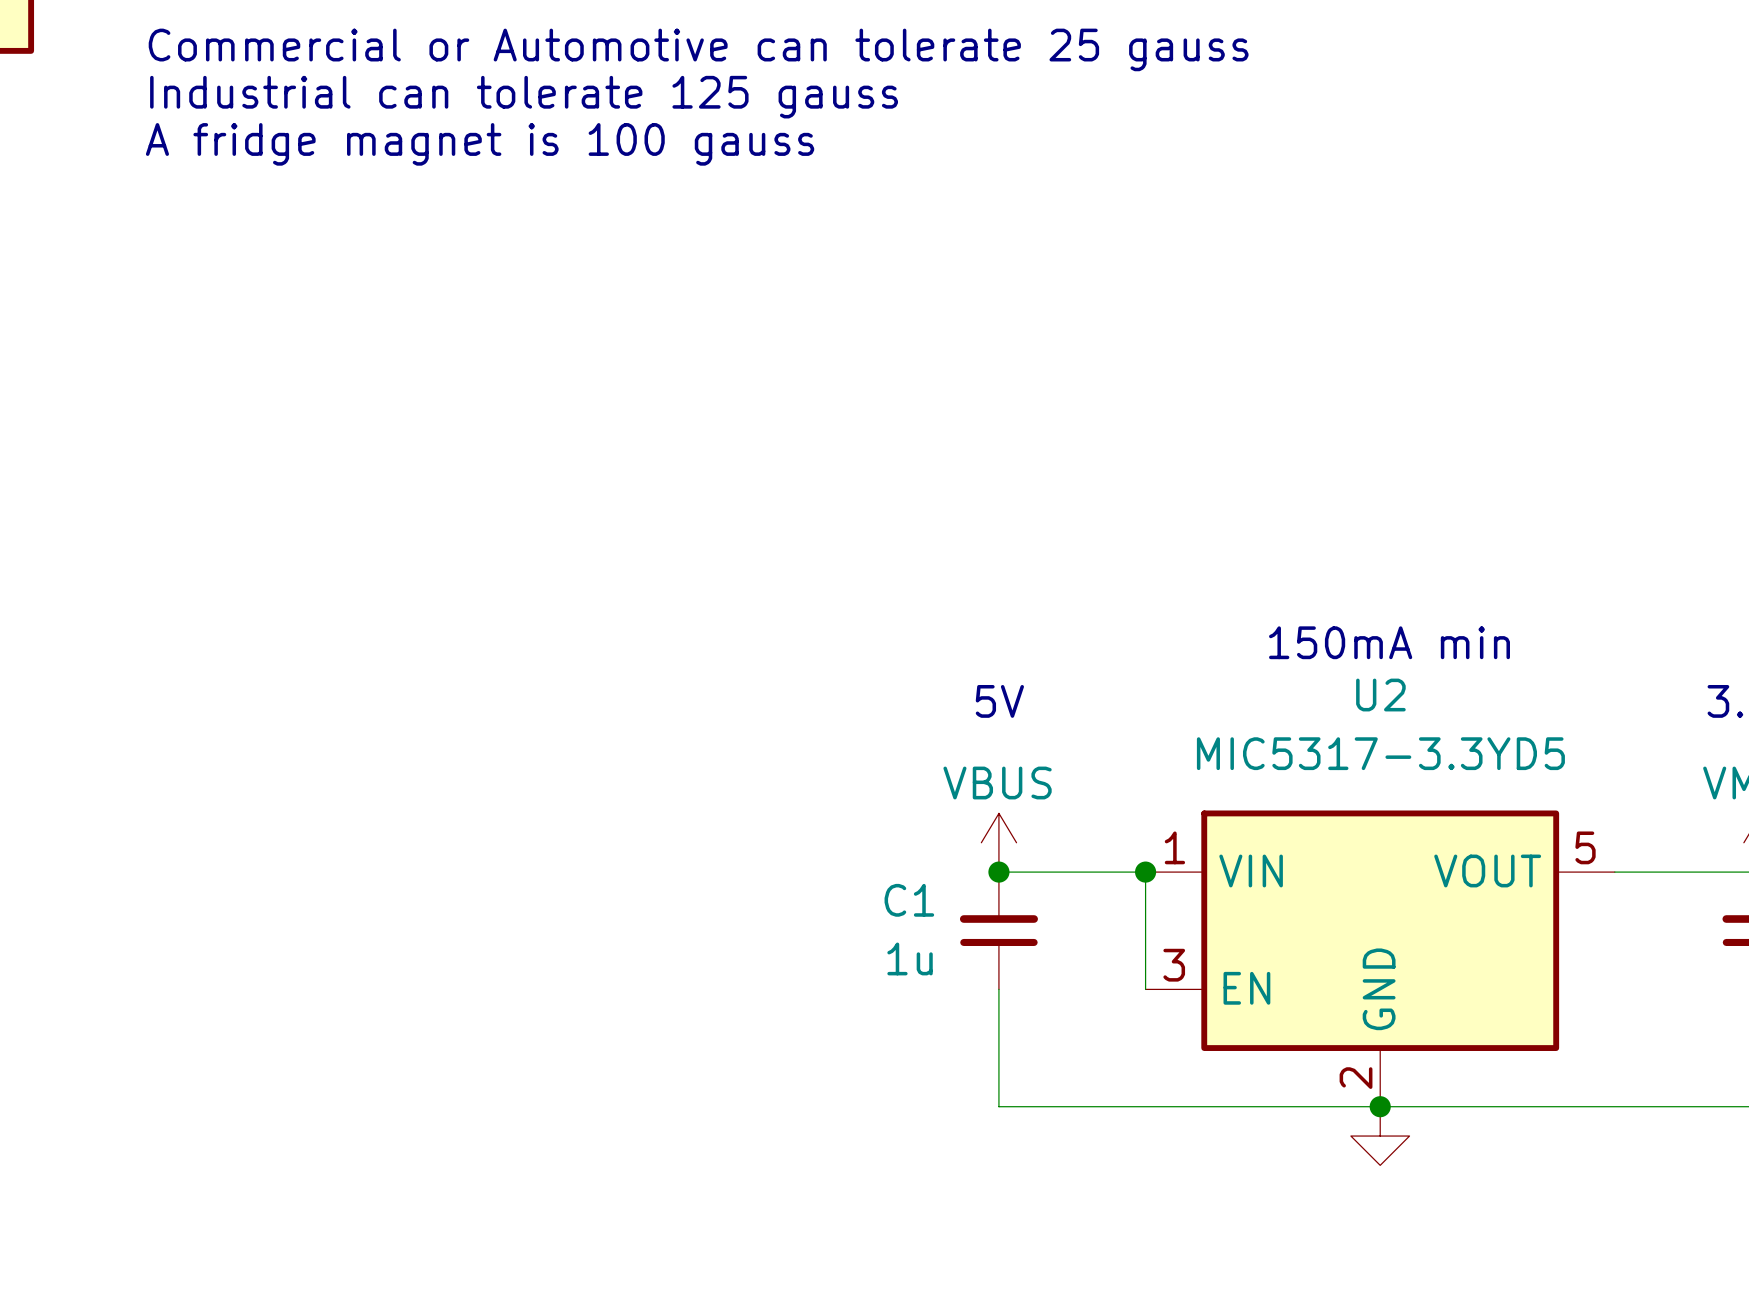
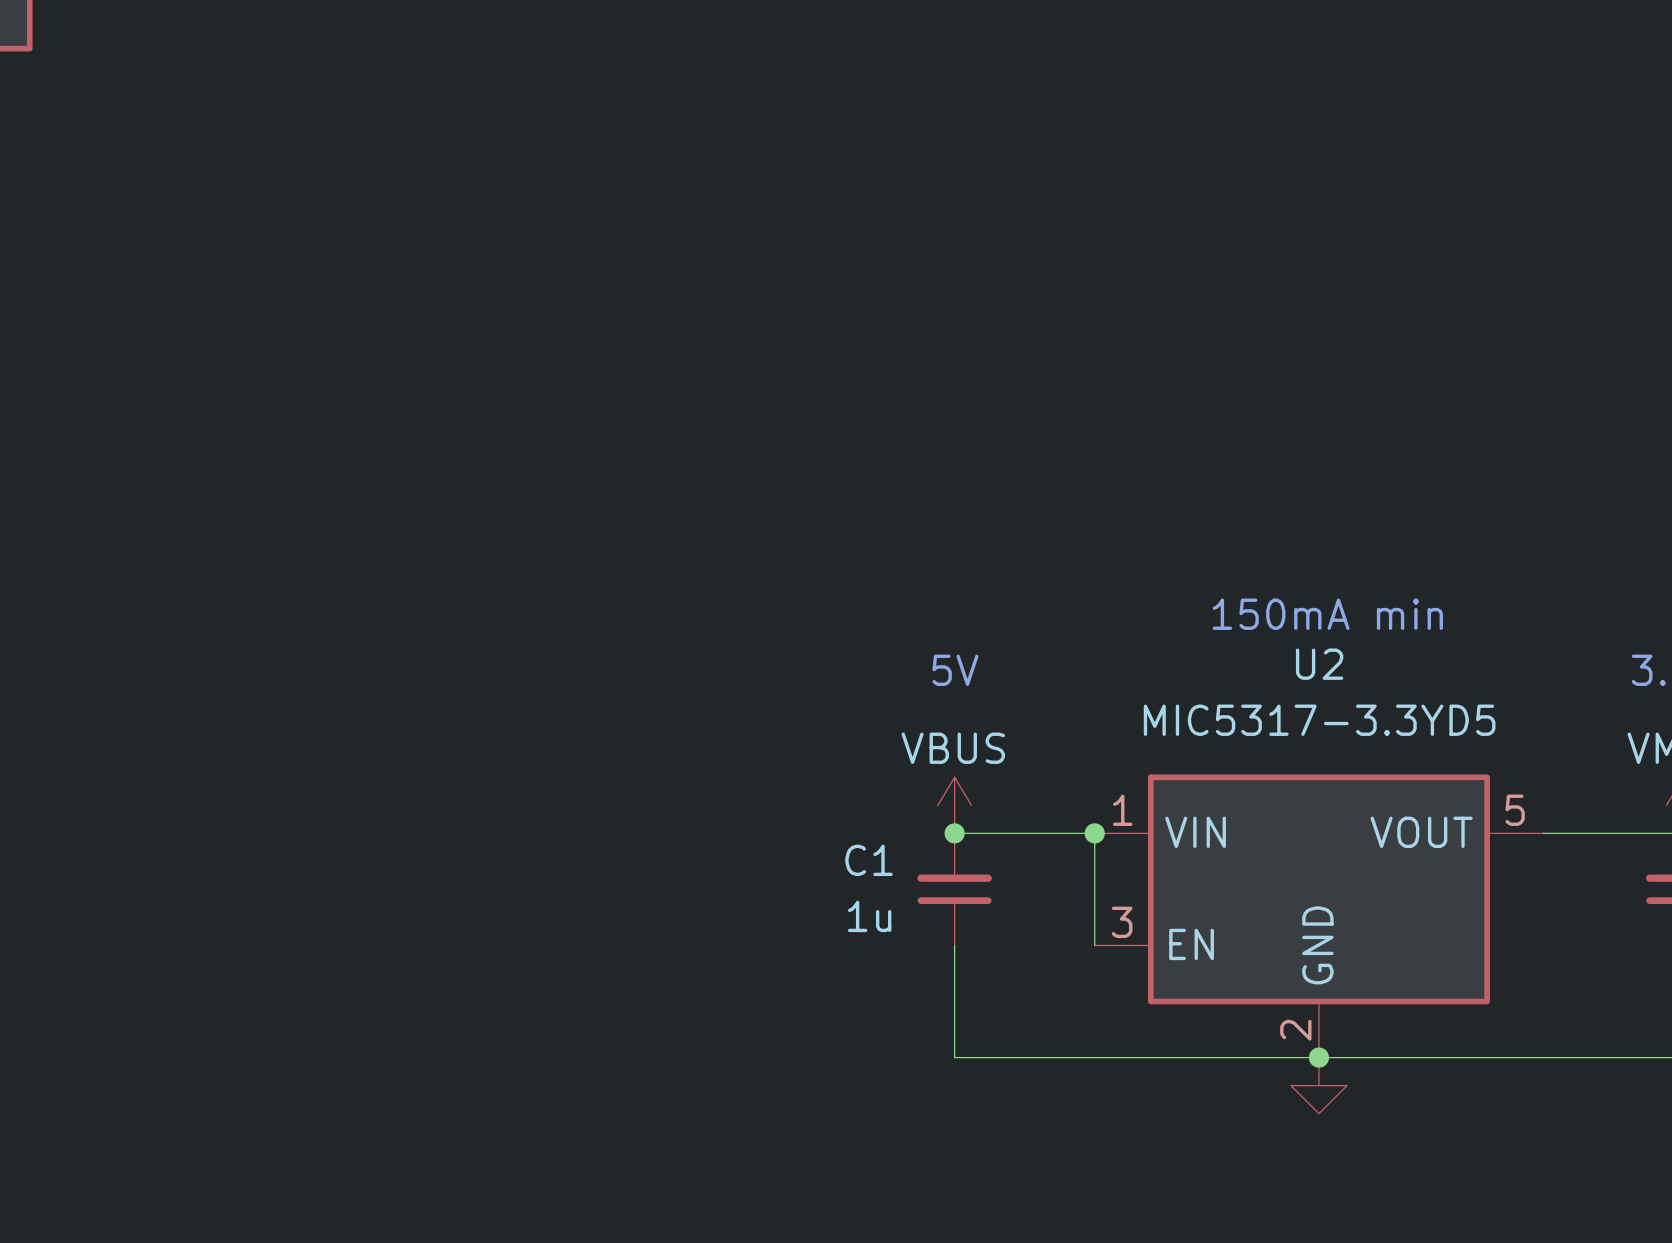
text: Commercial or Automotive can tolerate 25 gauss (698, 49) -> none
text: Industrial can tolerate 125 gauss (524, 97) -> none
text: A fridge magnet is 100 gauss (480, 144) -> none

